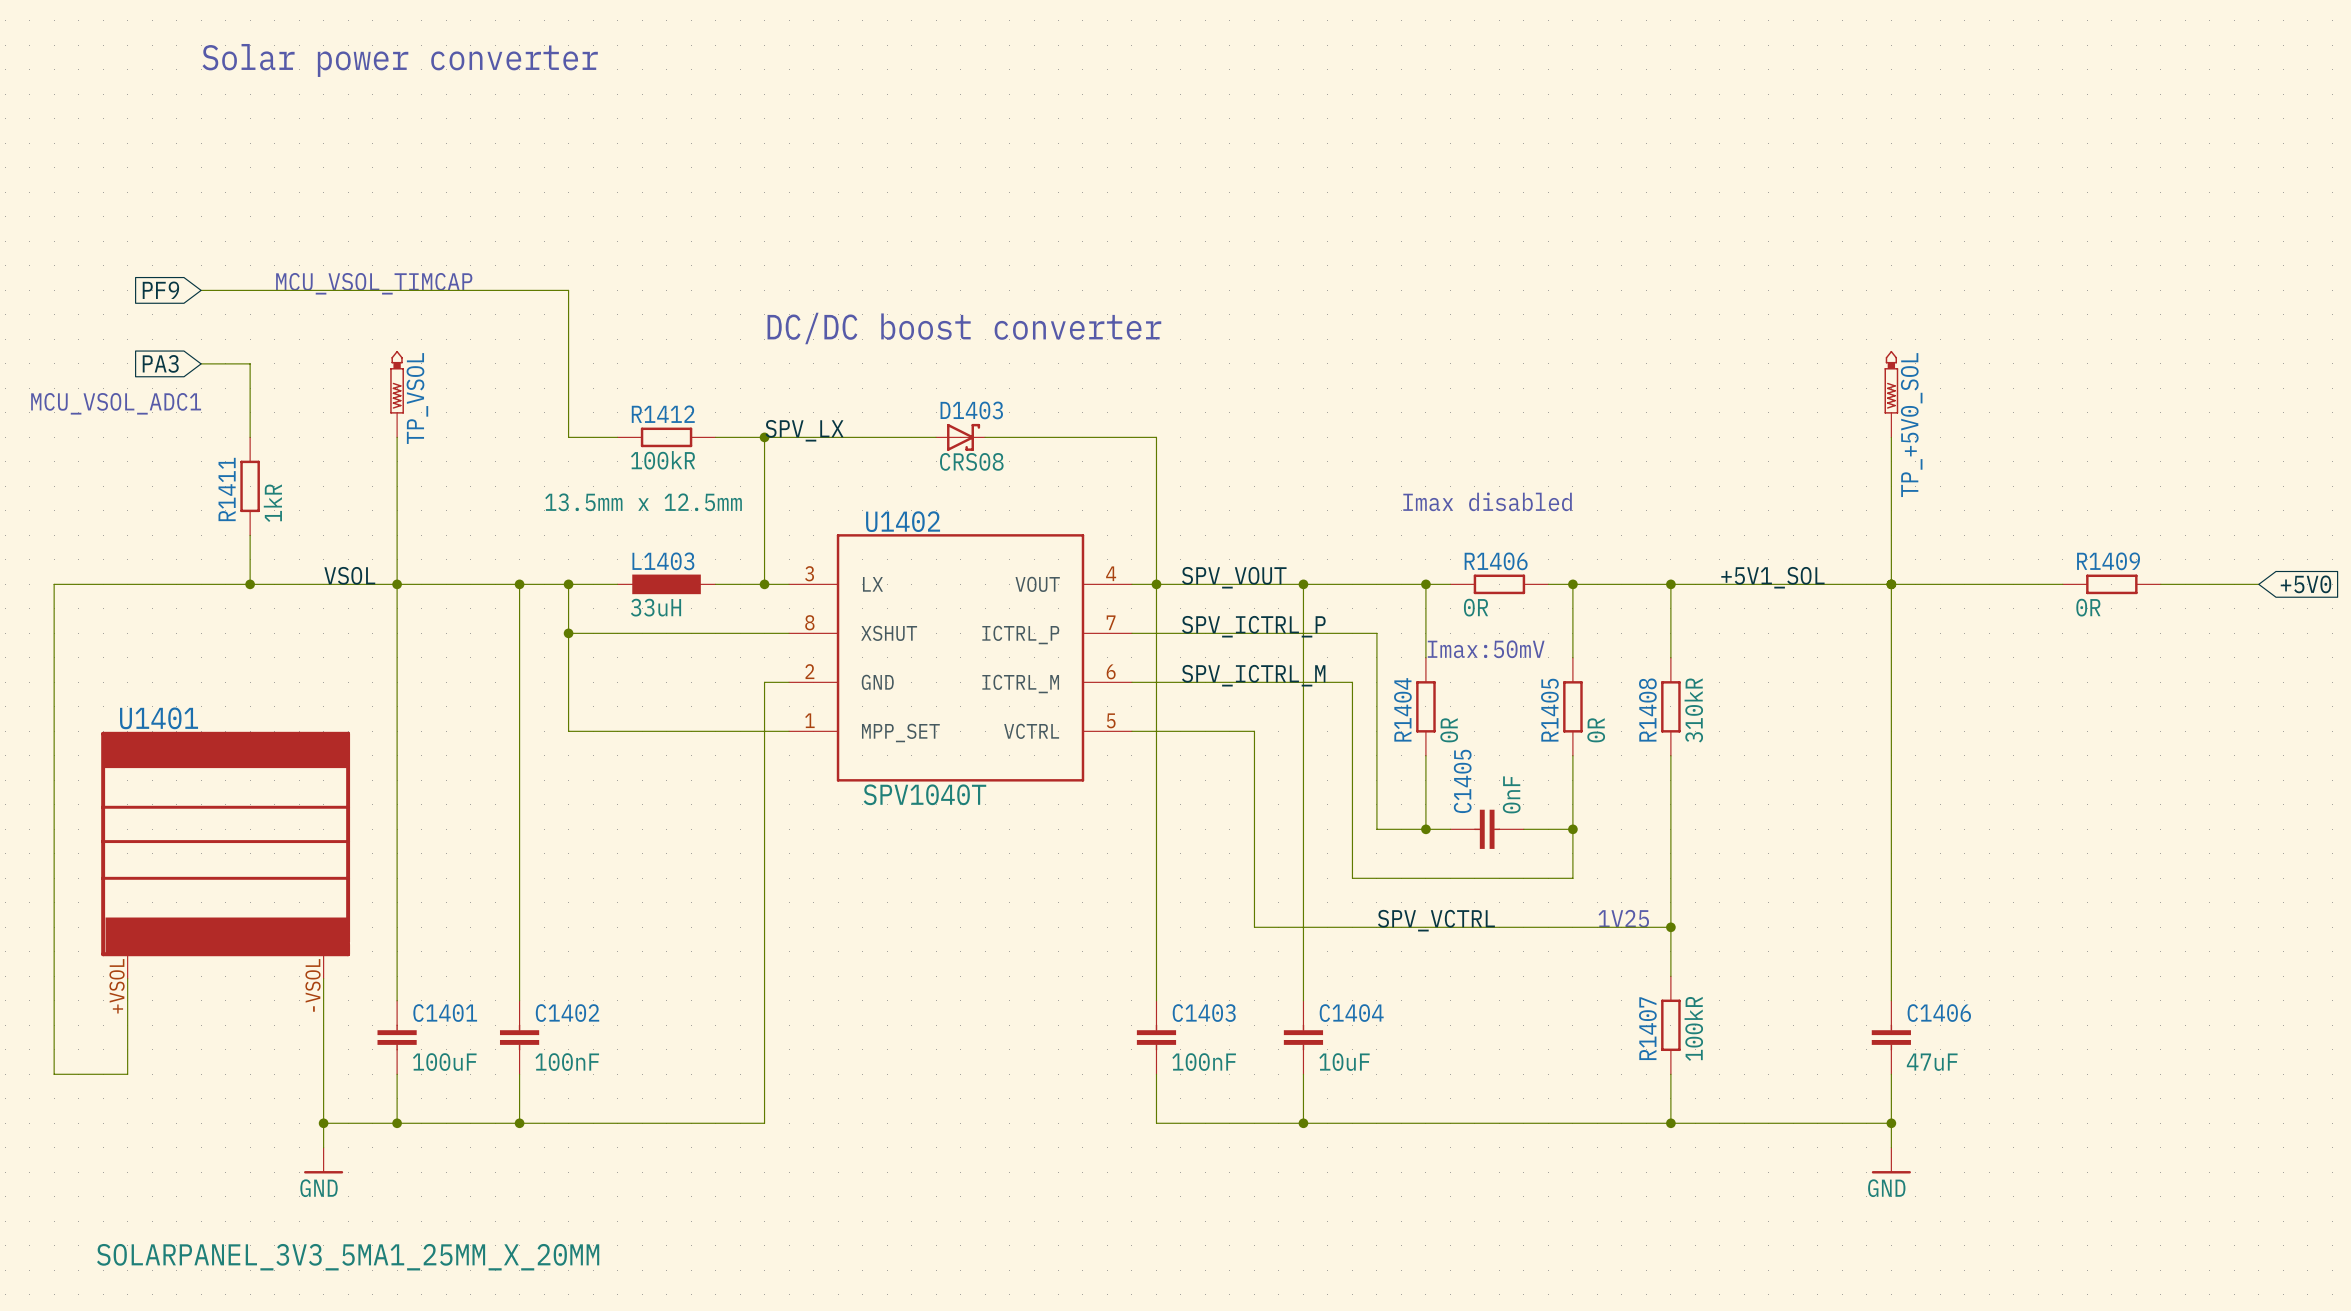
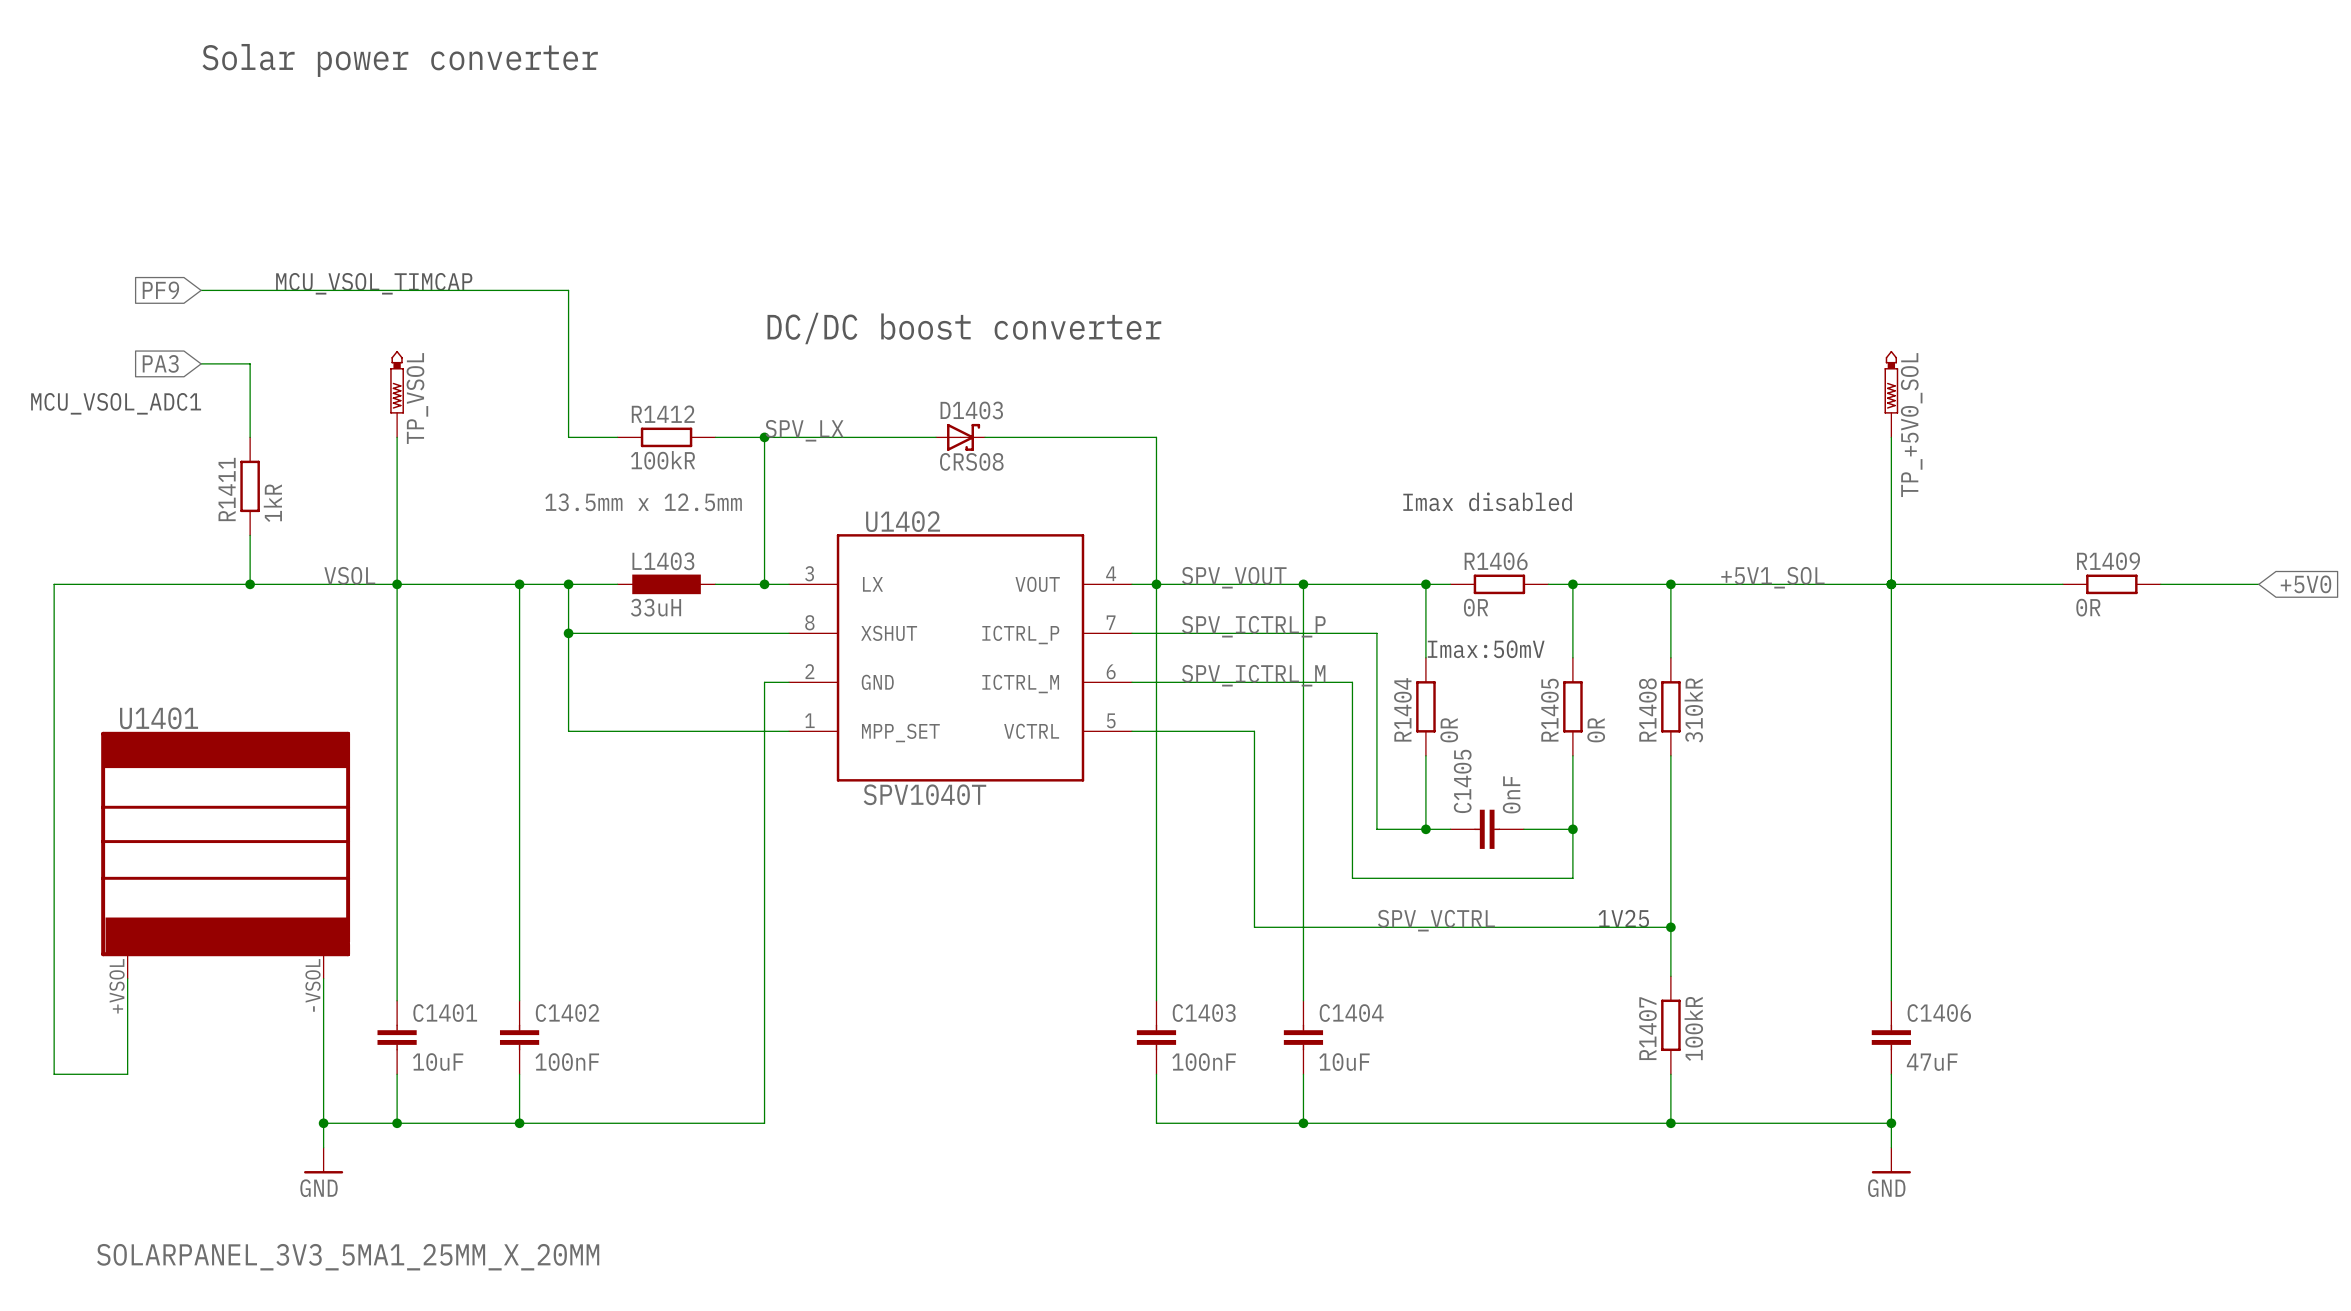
C1401 value: 100uF (444, 1062) -> 10uF (438, 1062)

